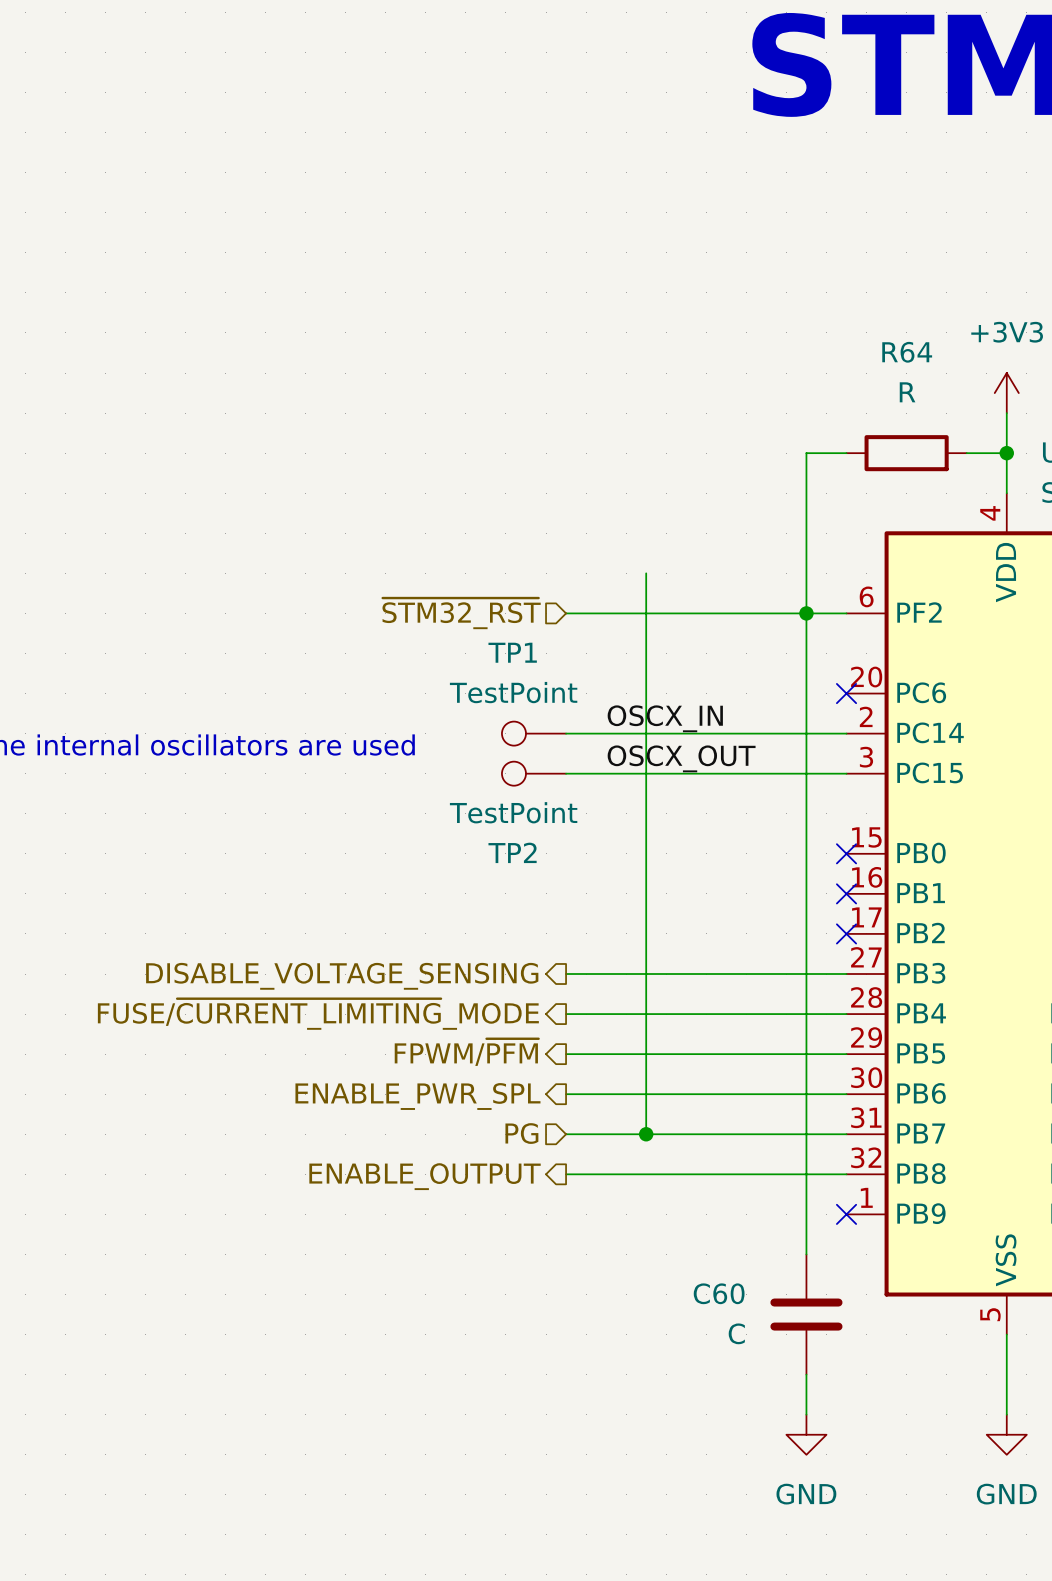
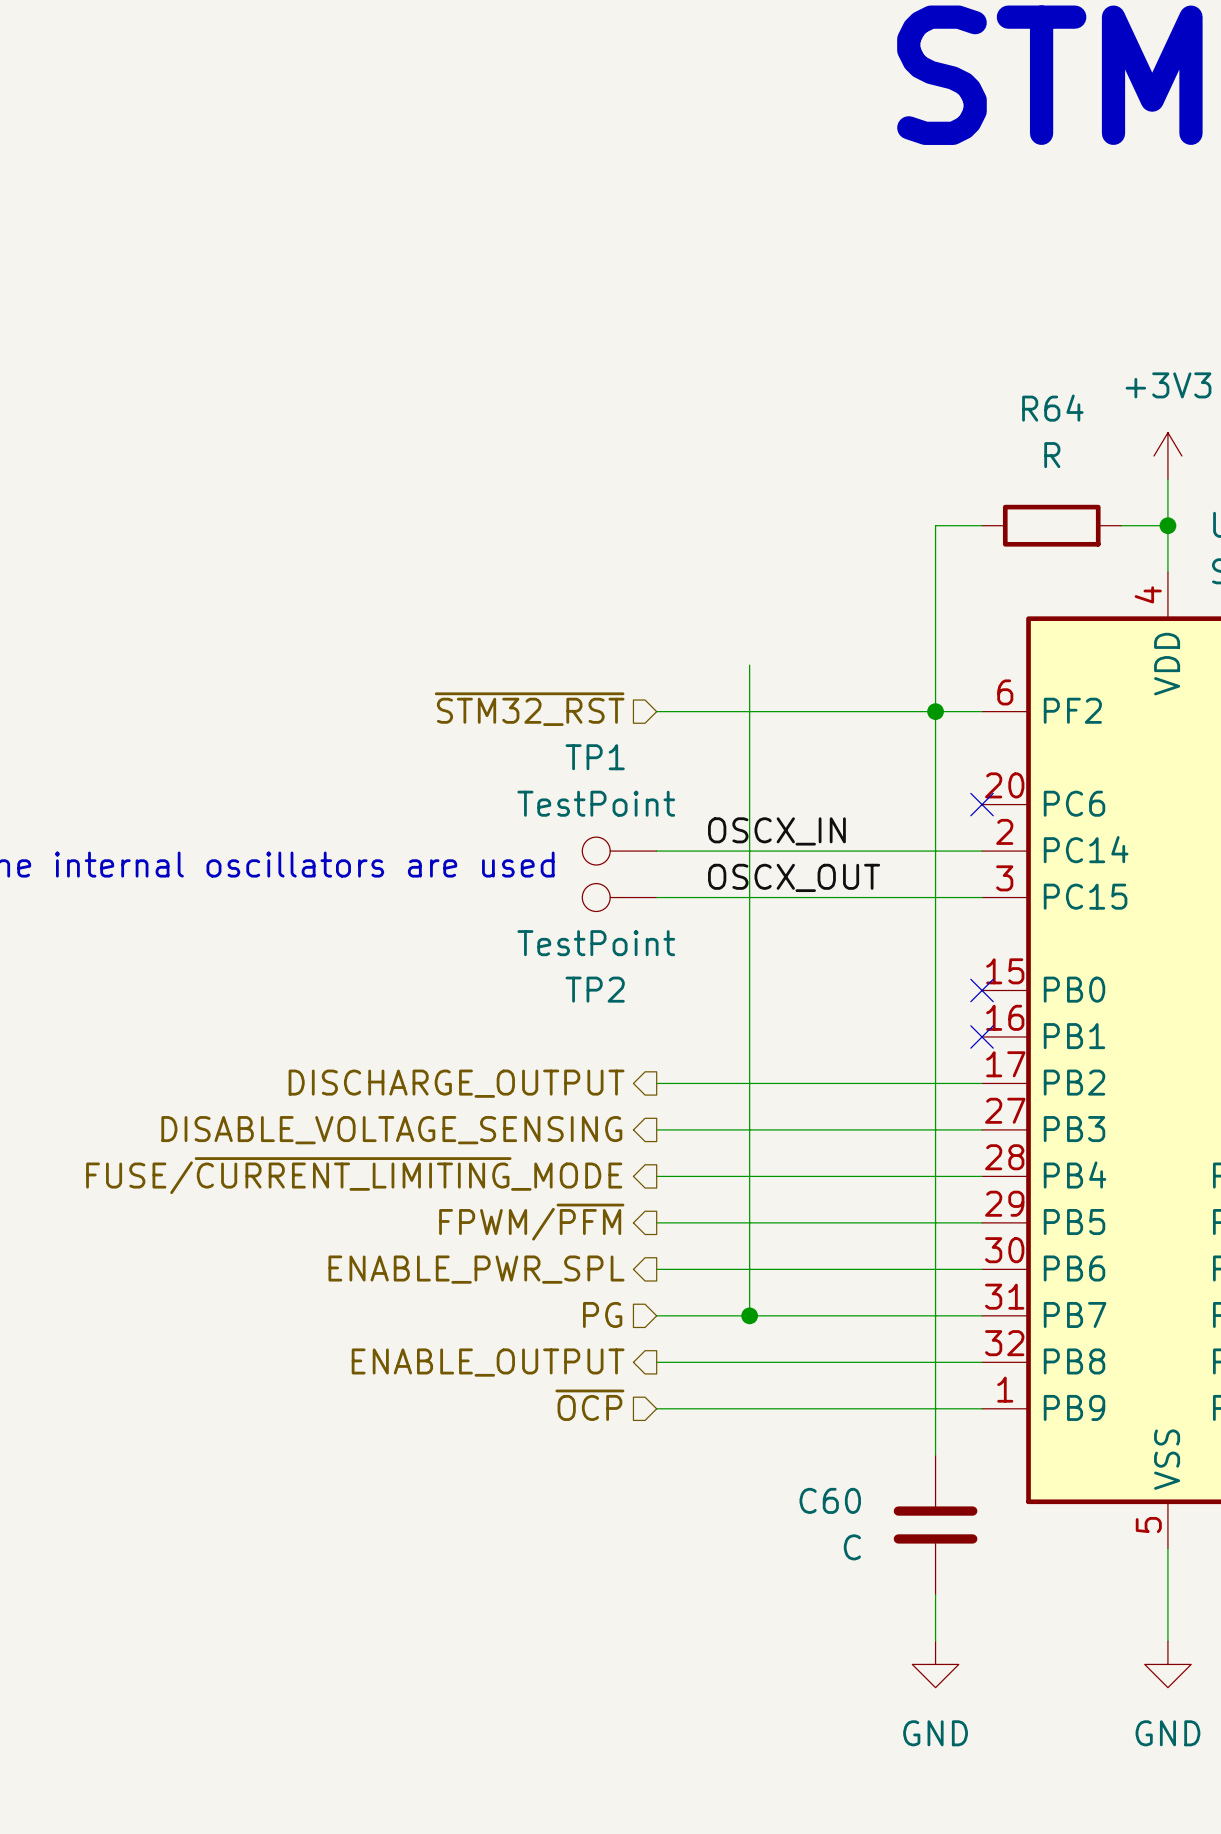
wire: none -> (656, 1083) (982, 1083)
no-connect mark: (846, 933) -> none
hierarchical label: none -> DISCHARGE_OUTPUT (456, 1083)
hierarchical label: none -> ~{OCP} (589, 1405)
wire: none -> (656, 1408) (982, 1408)
no-connect mark: (846, 1214) -> none

